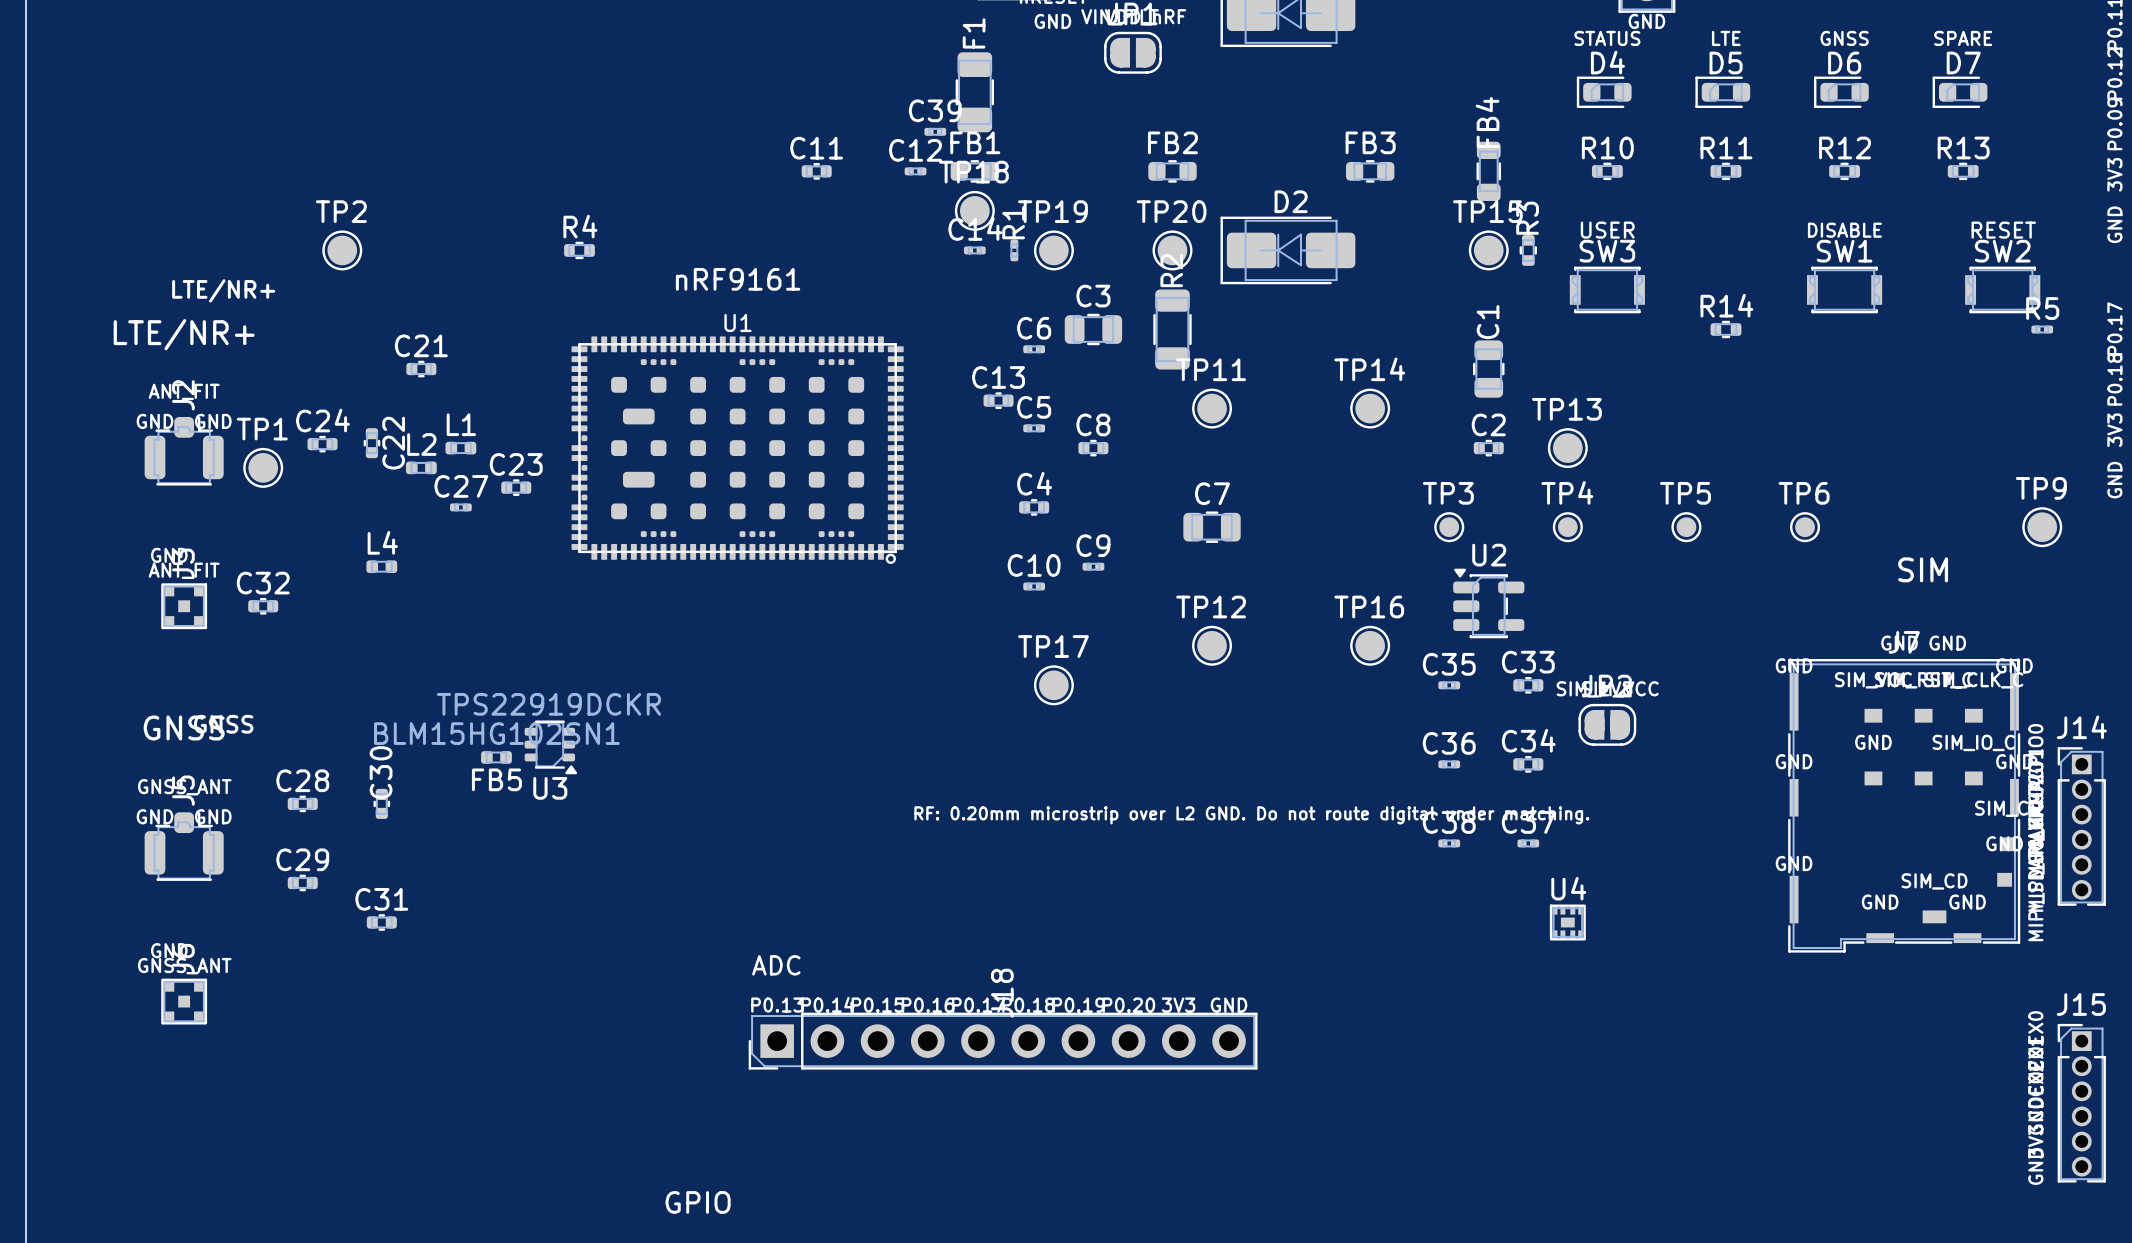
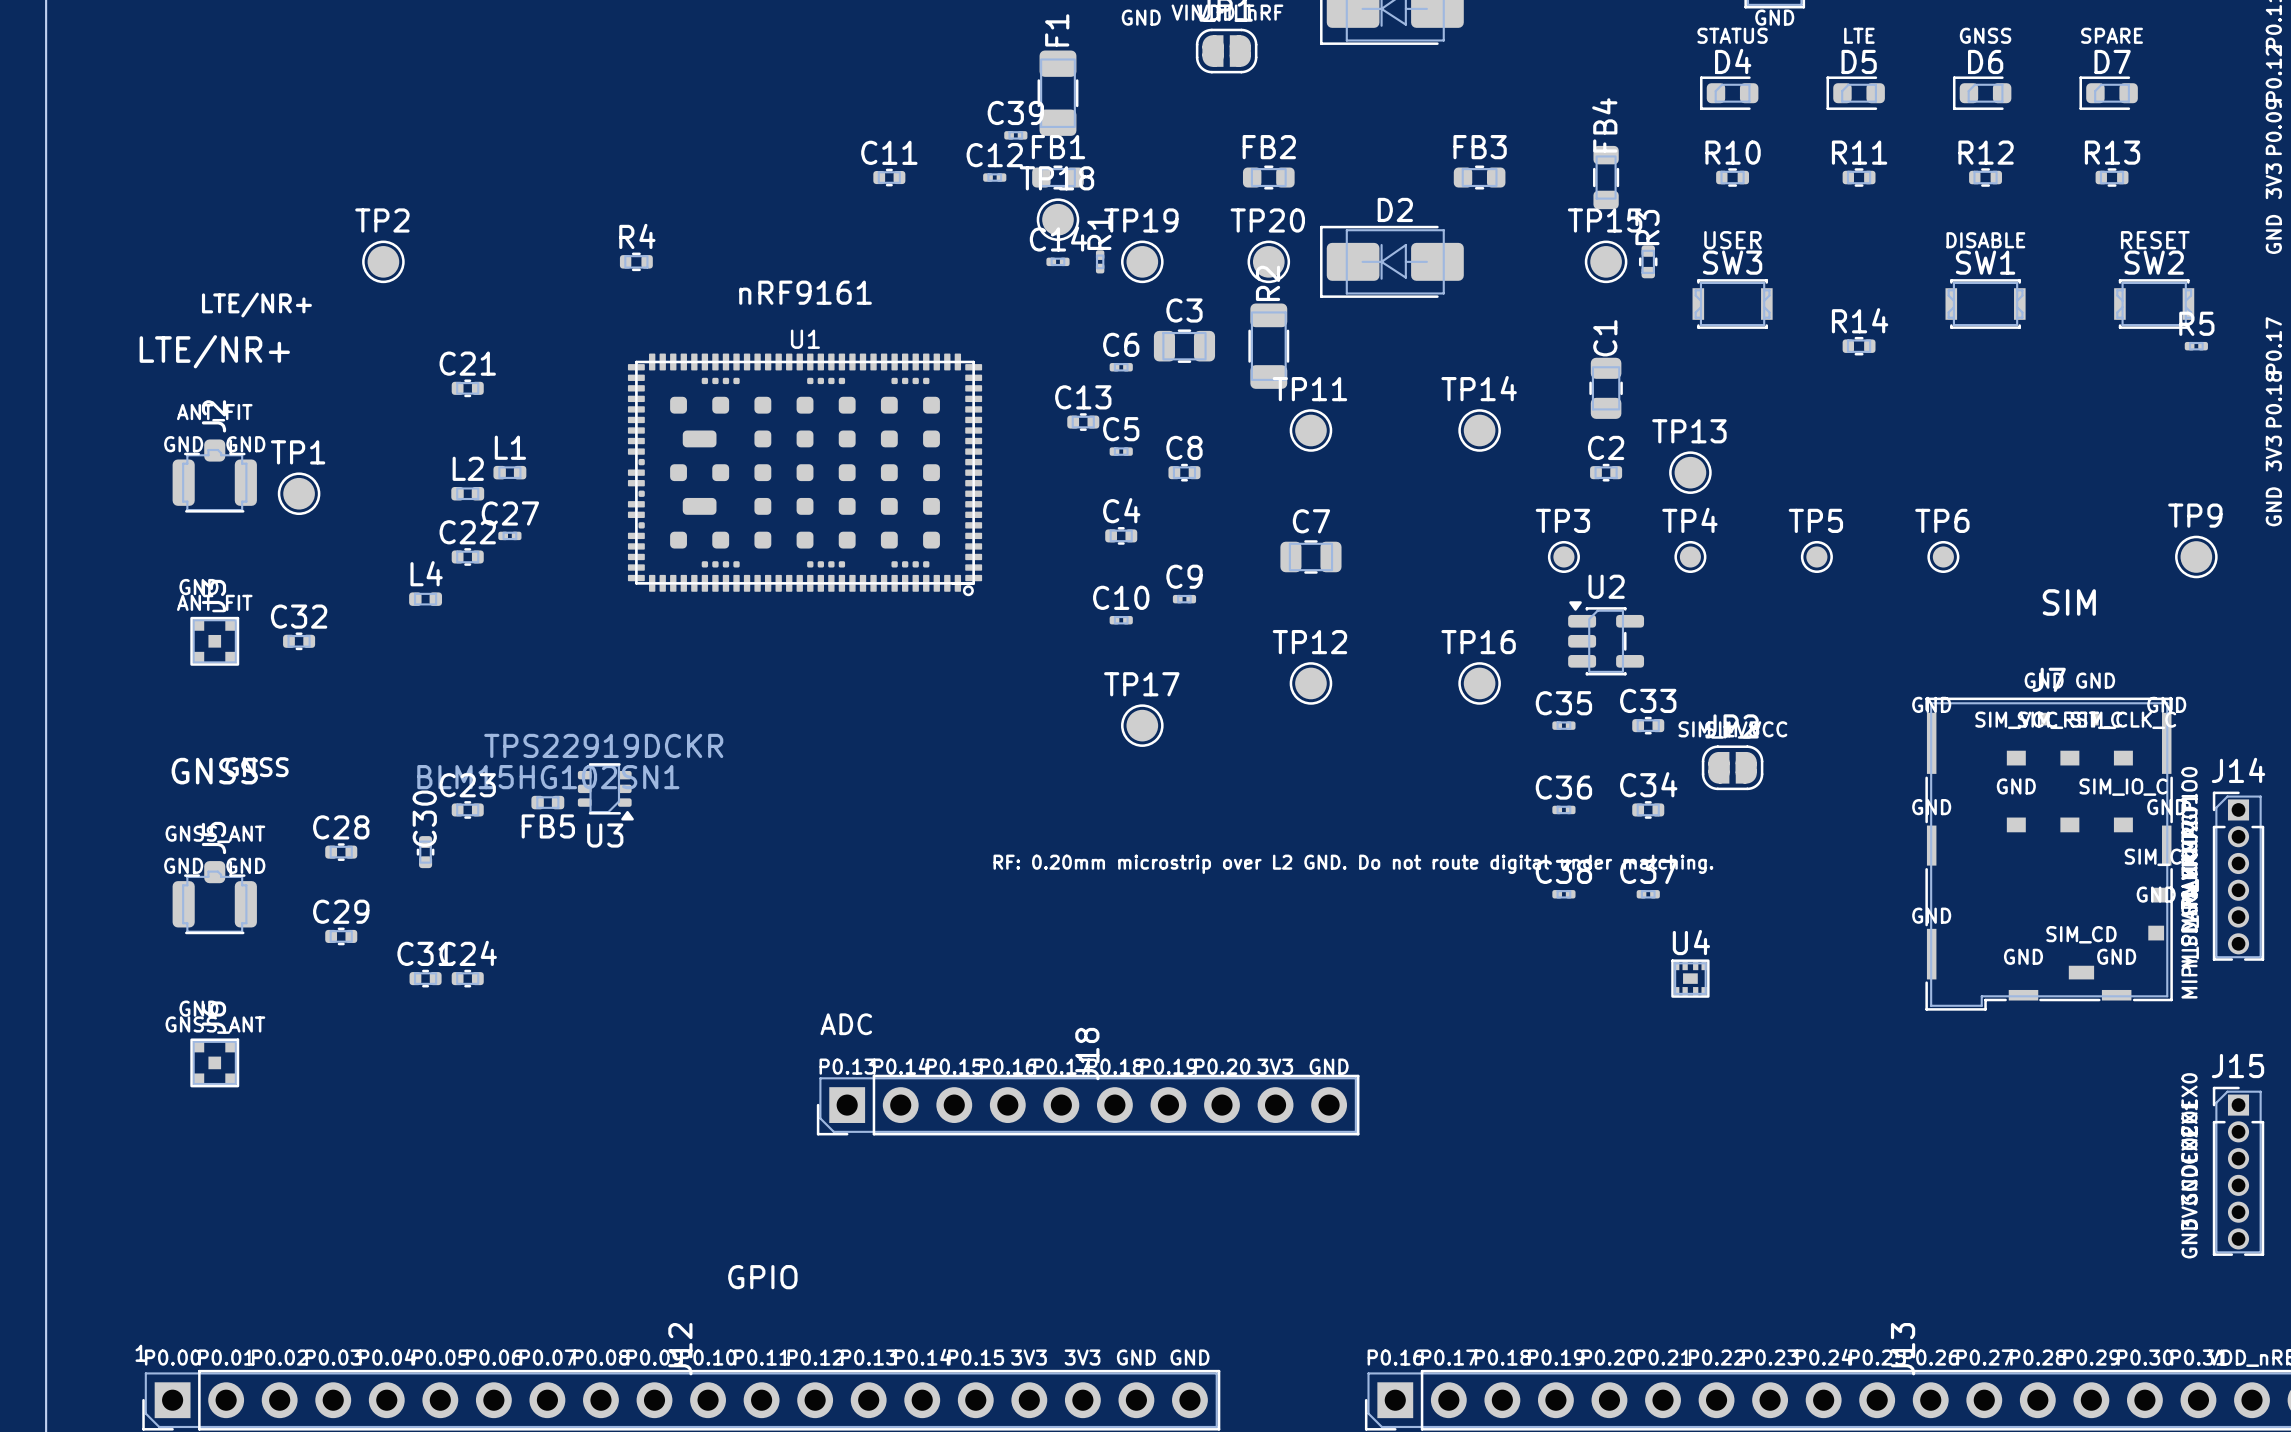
C22 rotation: 0° (371, 443) -> 90° clockwise (467, 556)
C22 position: (371, 443) -> (467, 556)
C24 position: (322, 444) -> (467, 978)
C23 position: (516, 487) -> (467, 809)

